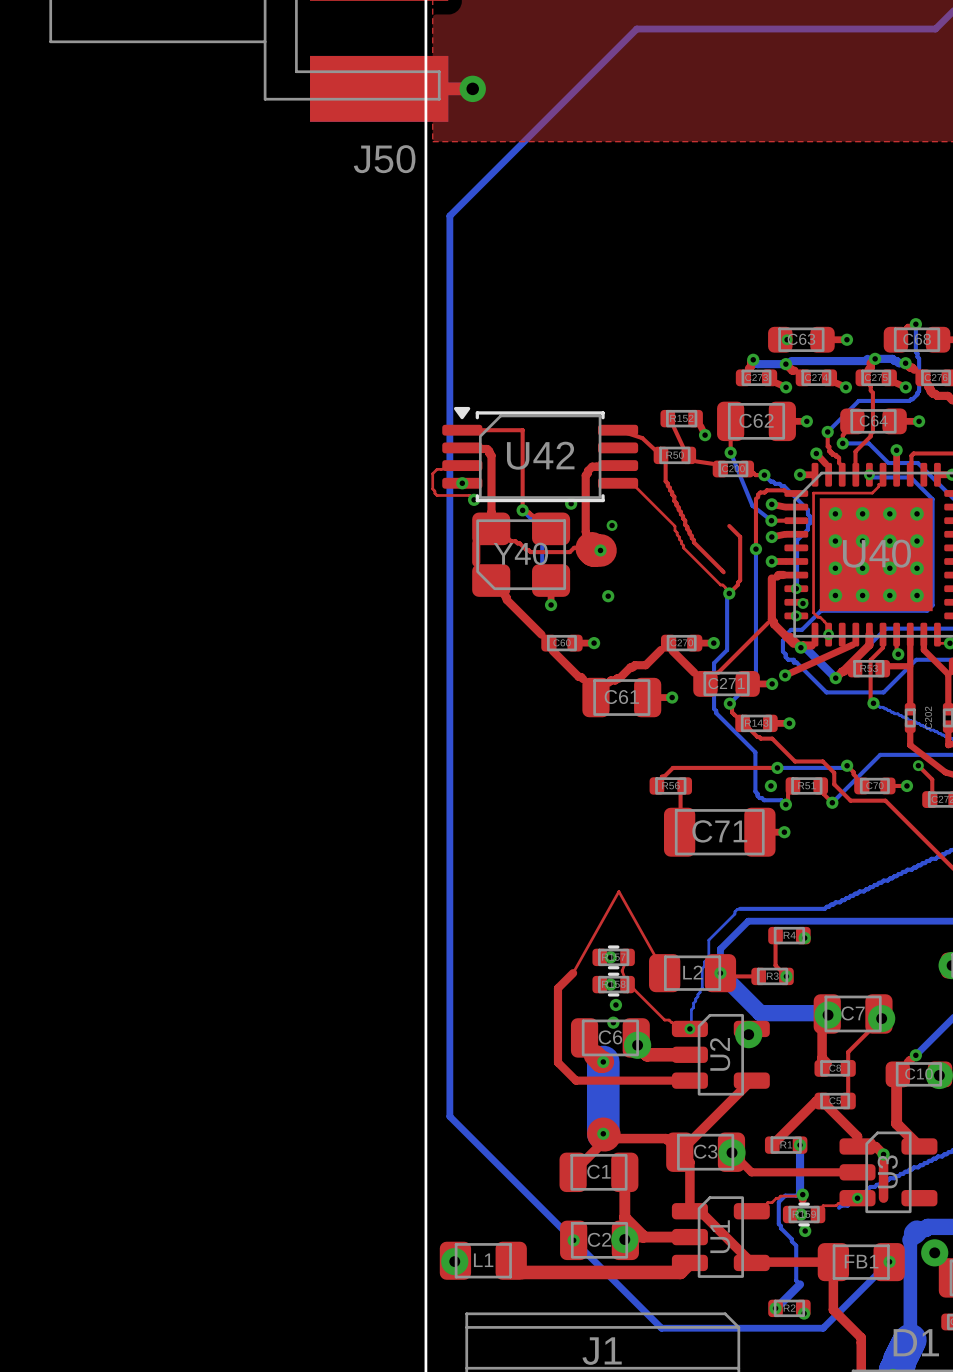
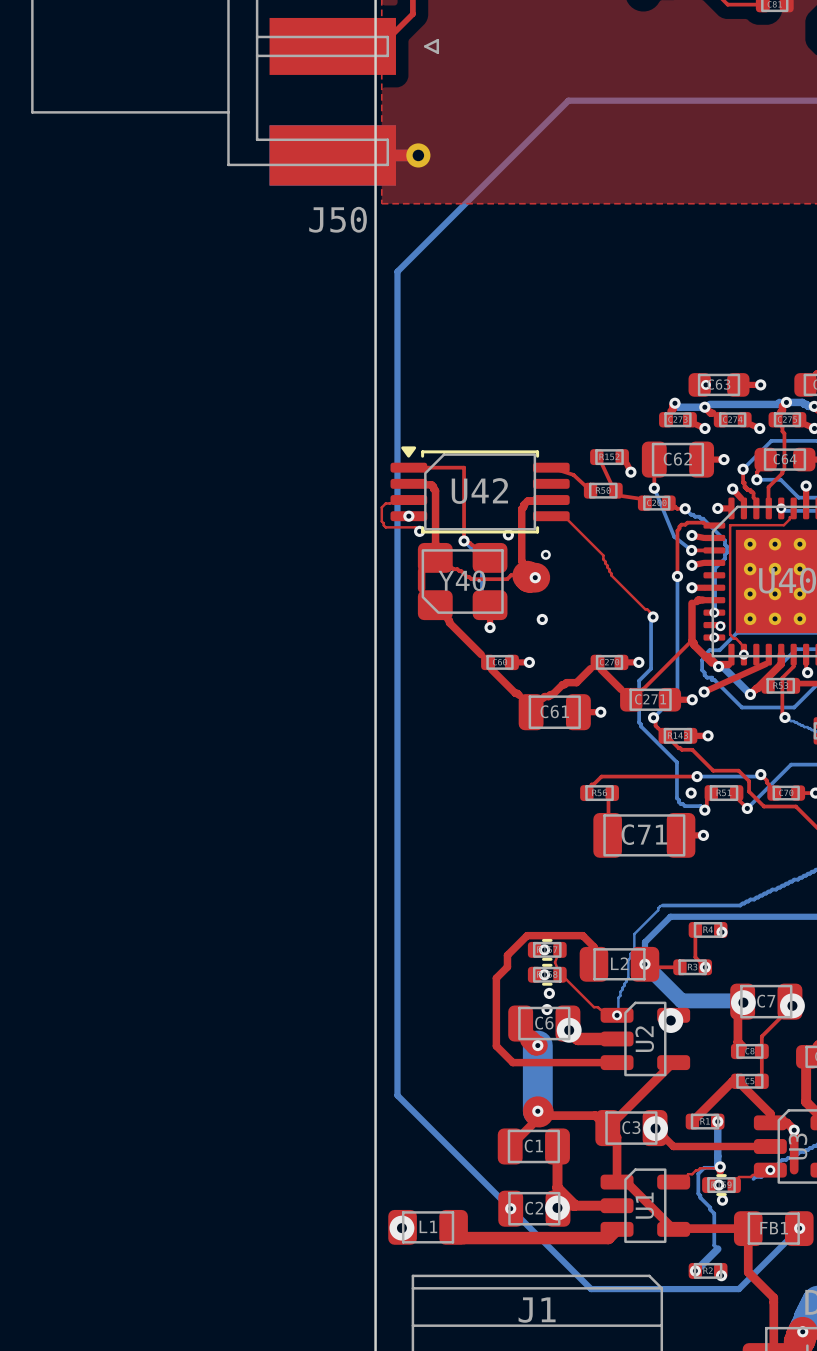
top track: (665, 461) (665, 481) (693, 542) (723, 572) -> none
top track: (729, 525) (740, 536) (740, 580) (729, 593) -> none
top track: (664, 973) (618, 891) (570, 976) -> (593, 964) (593, 946) (582, 935) (527, 935) (507, 955) (507, 967)

